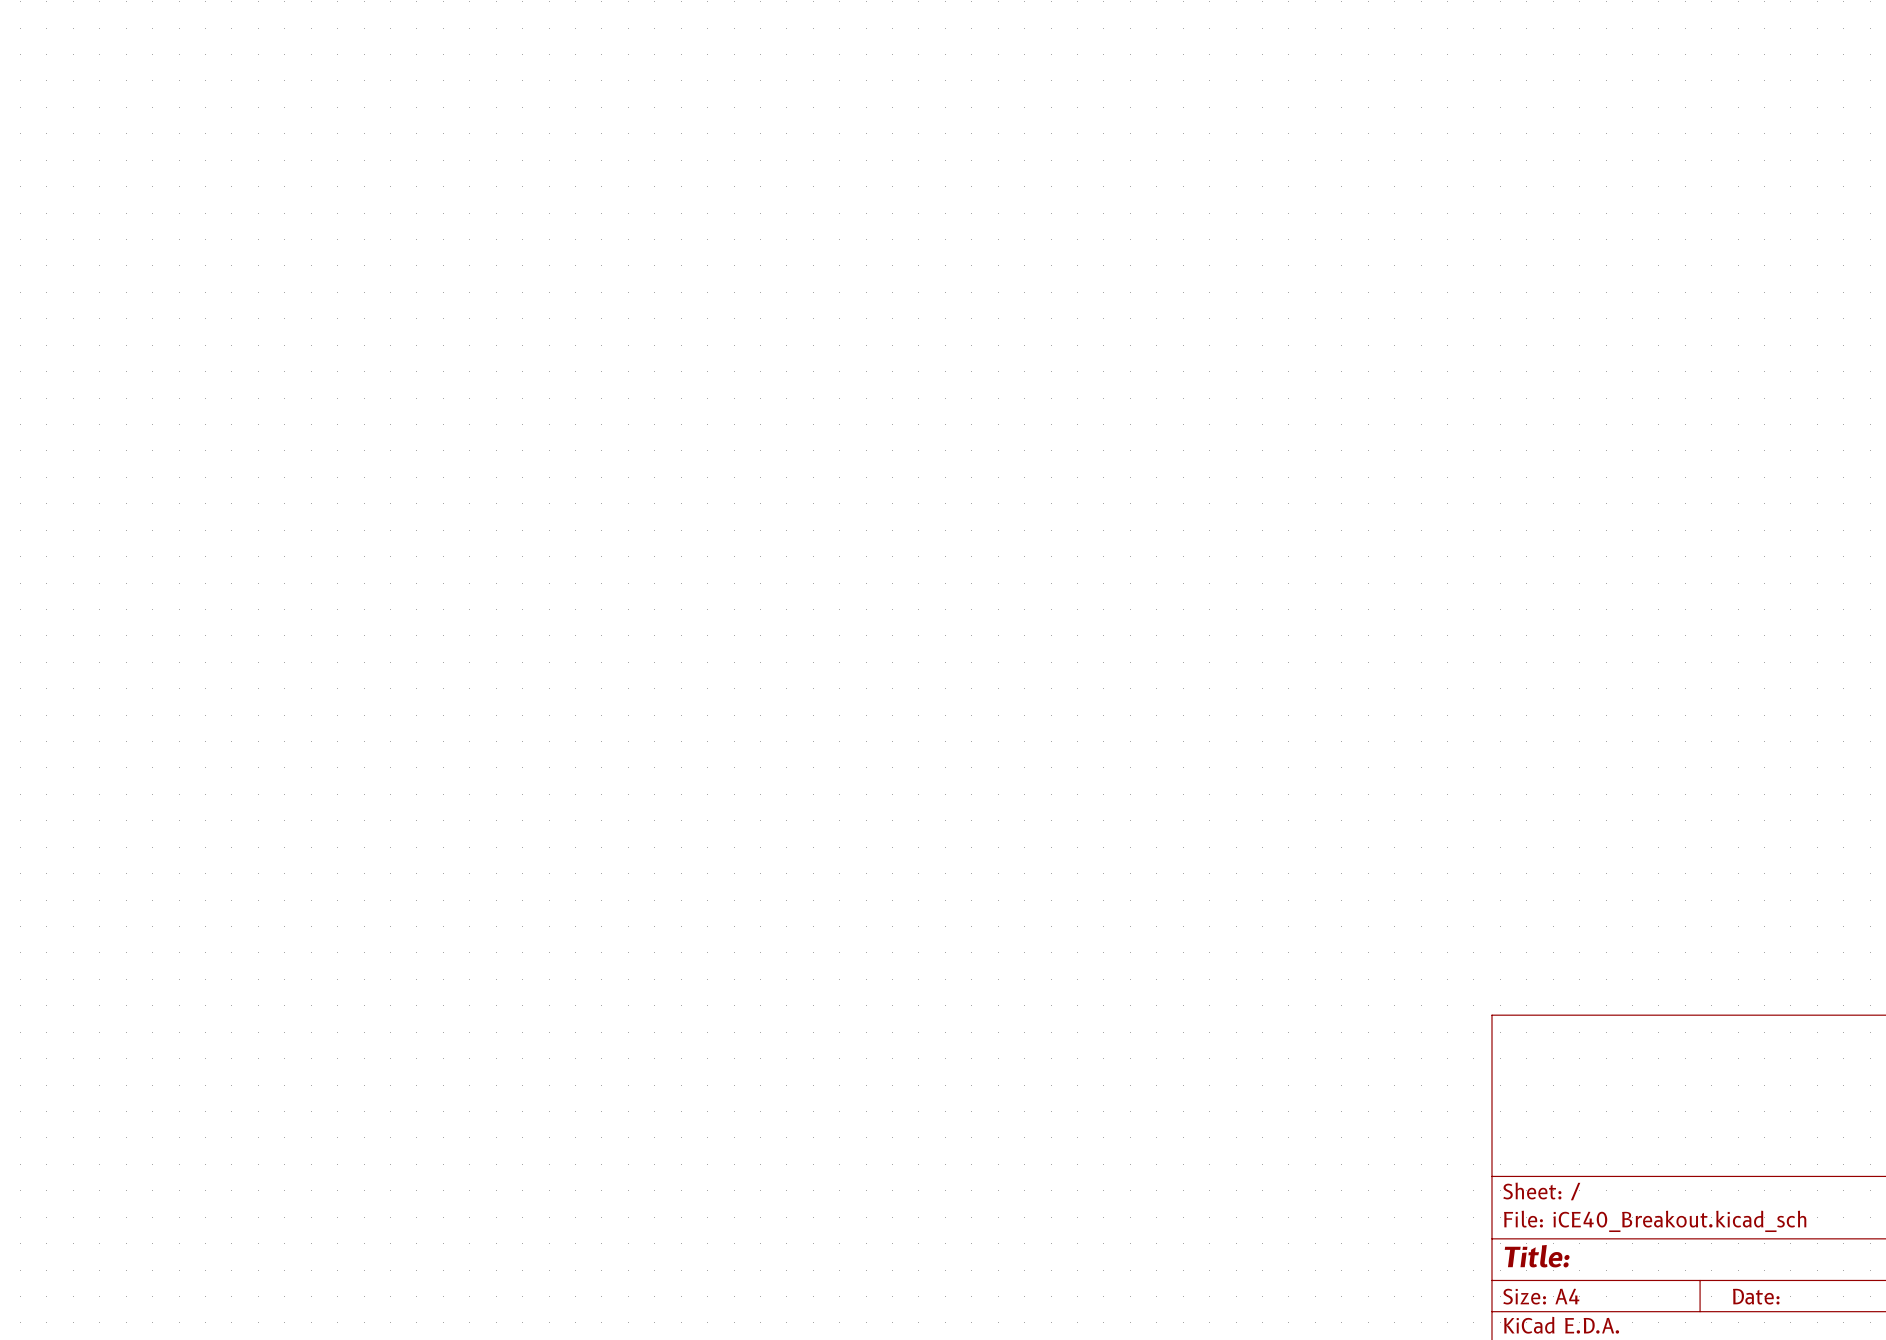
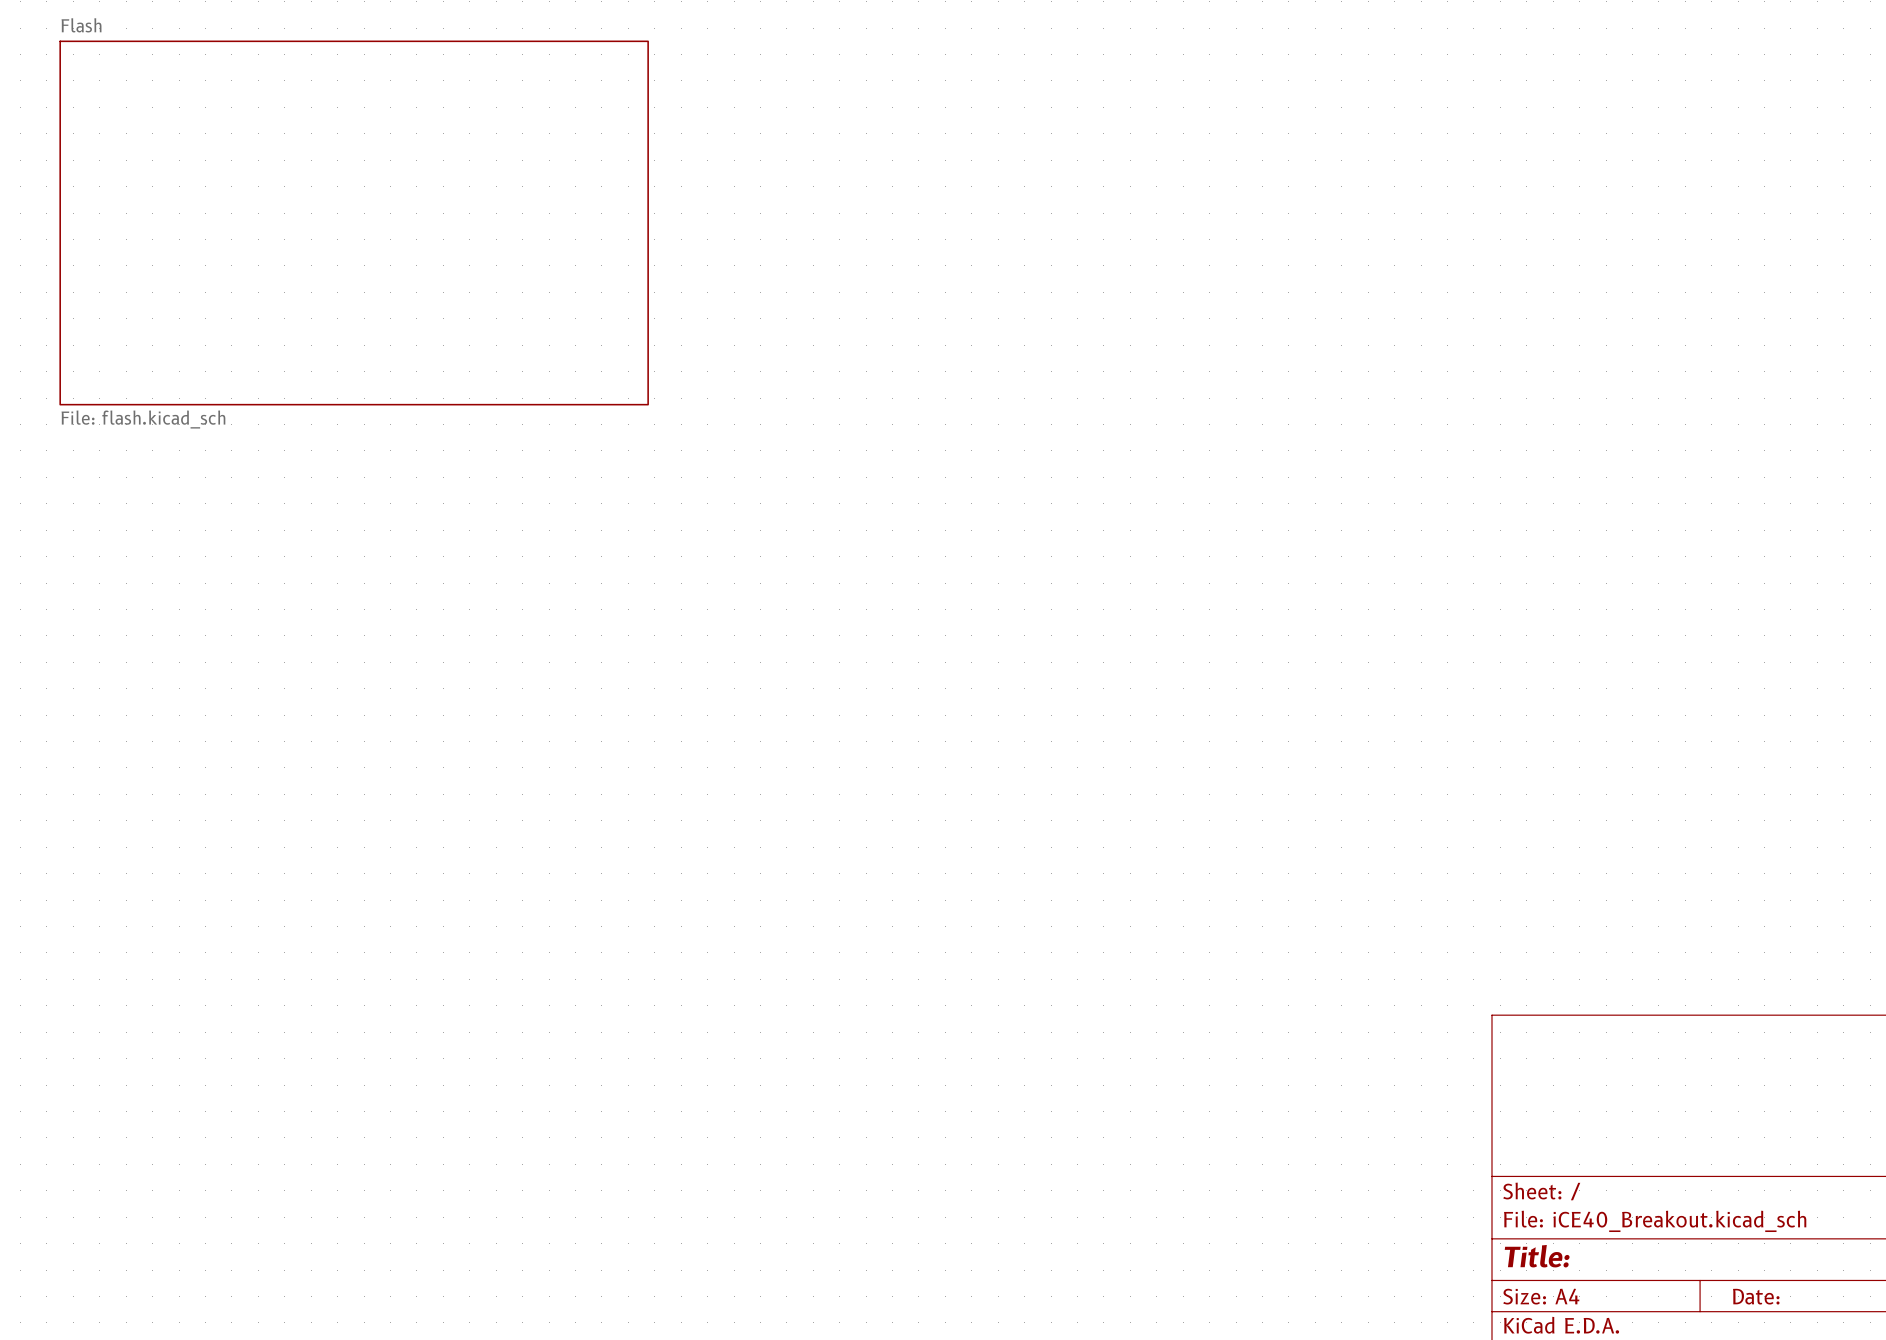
sheet Flash: none -> File: flash.kicad_sch (354, 222)

